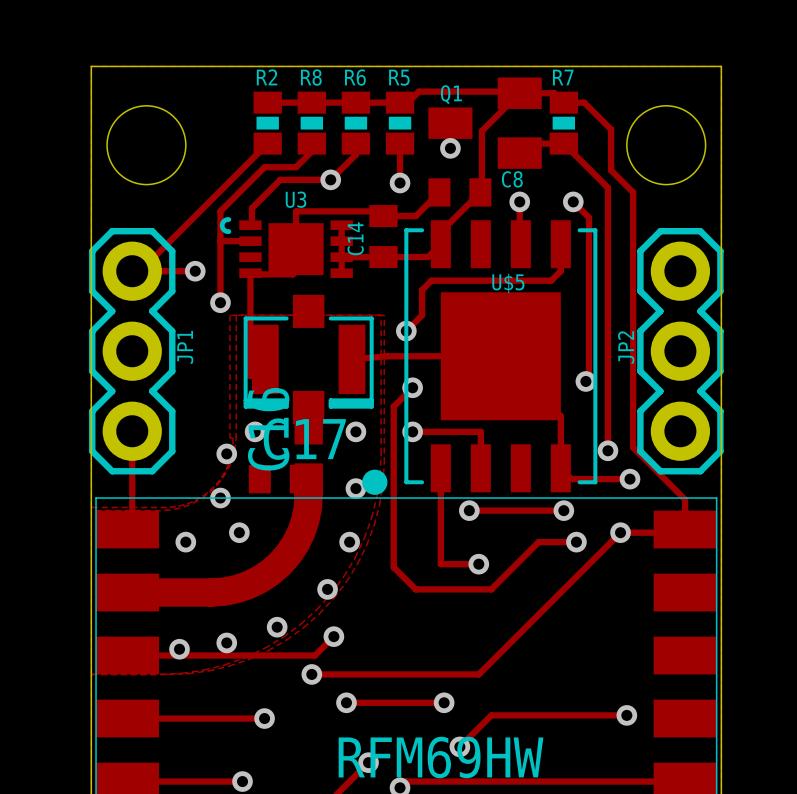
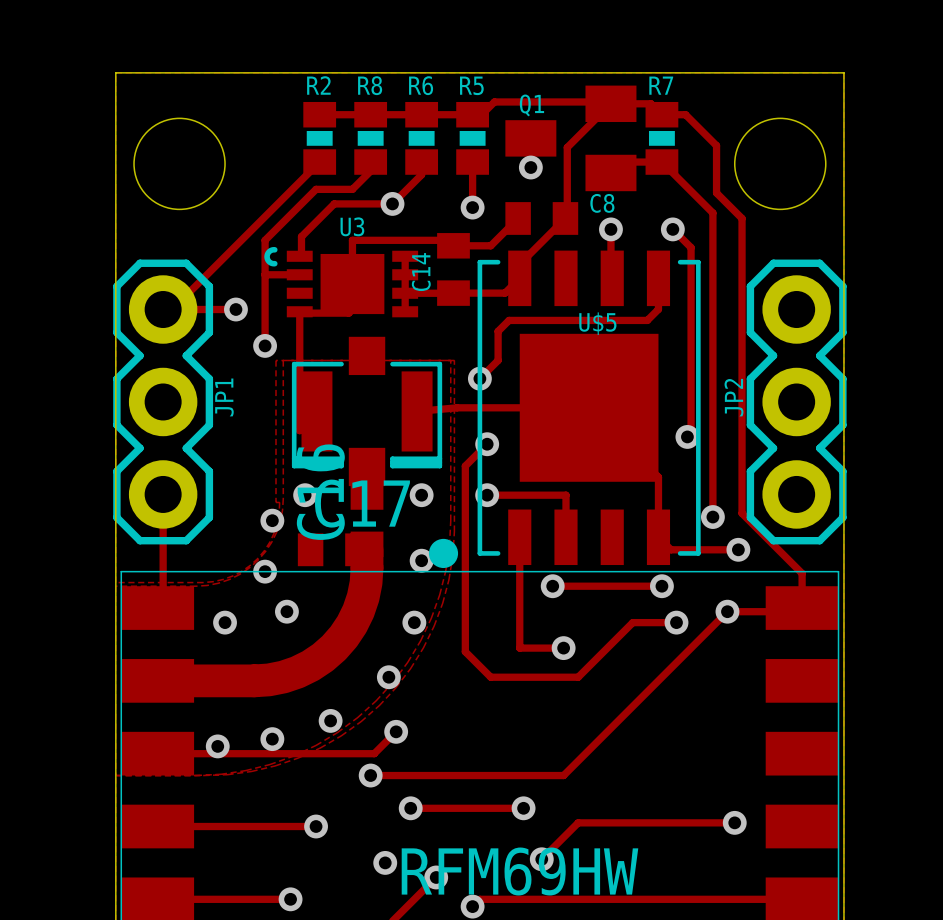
via: none -> (385, 862)

